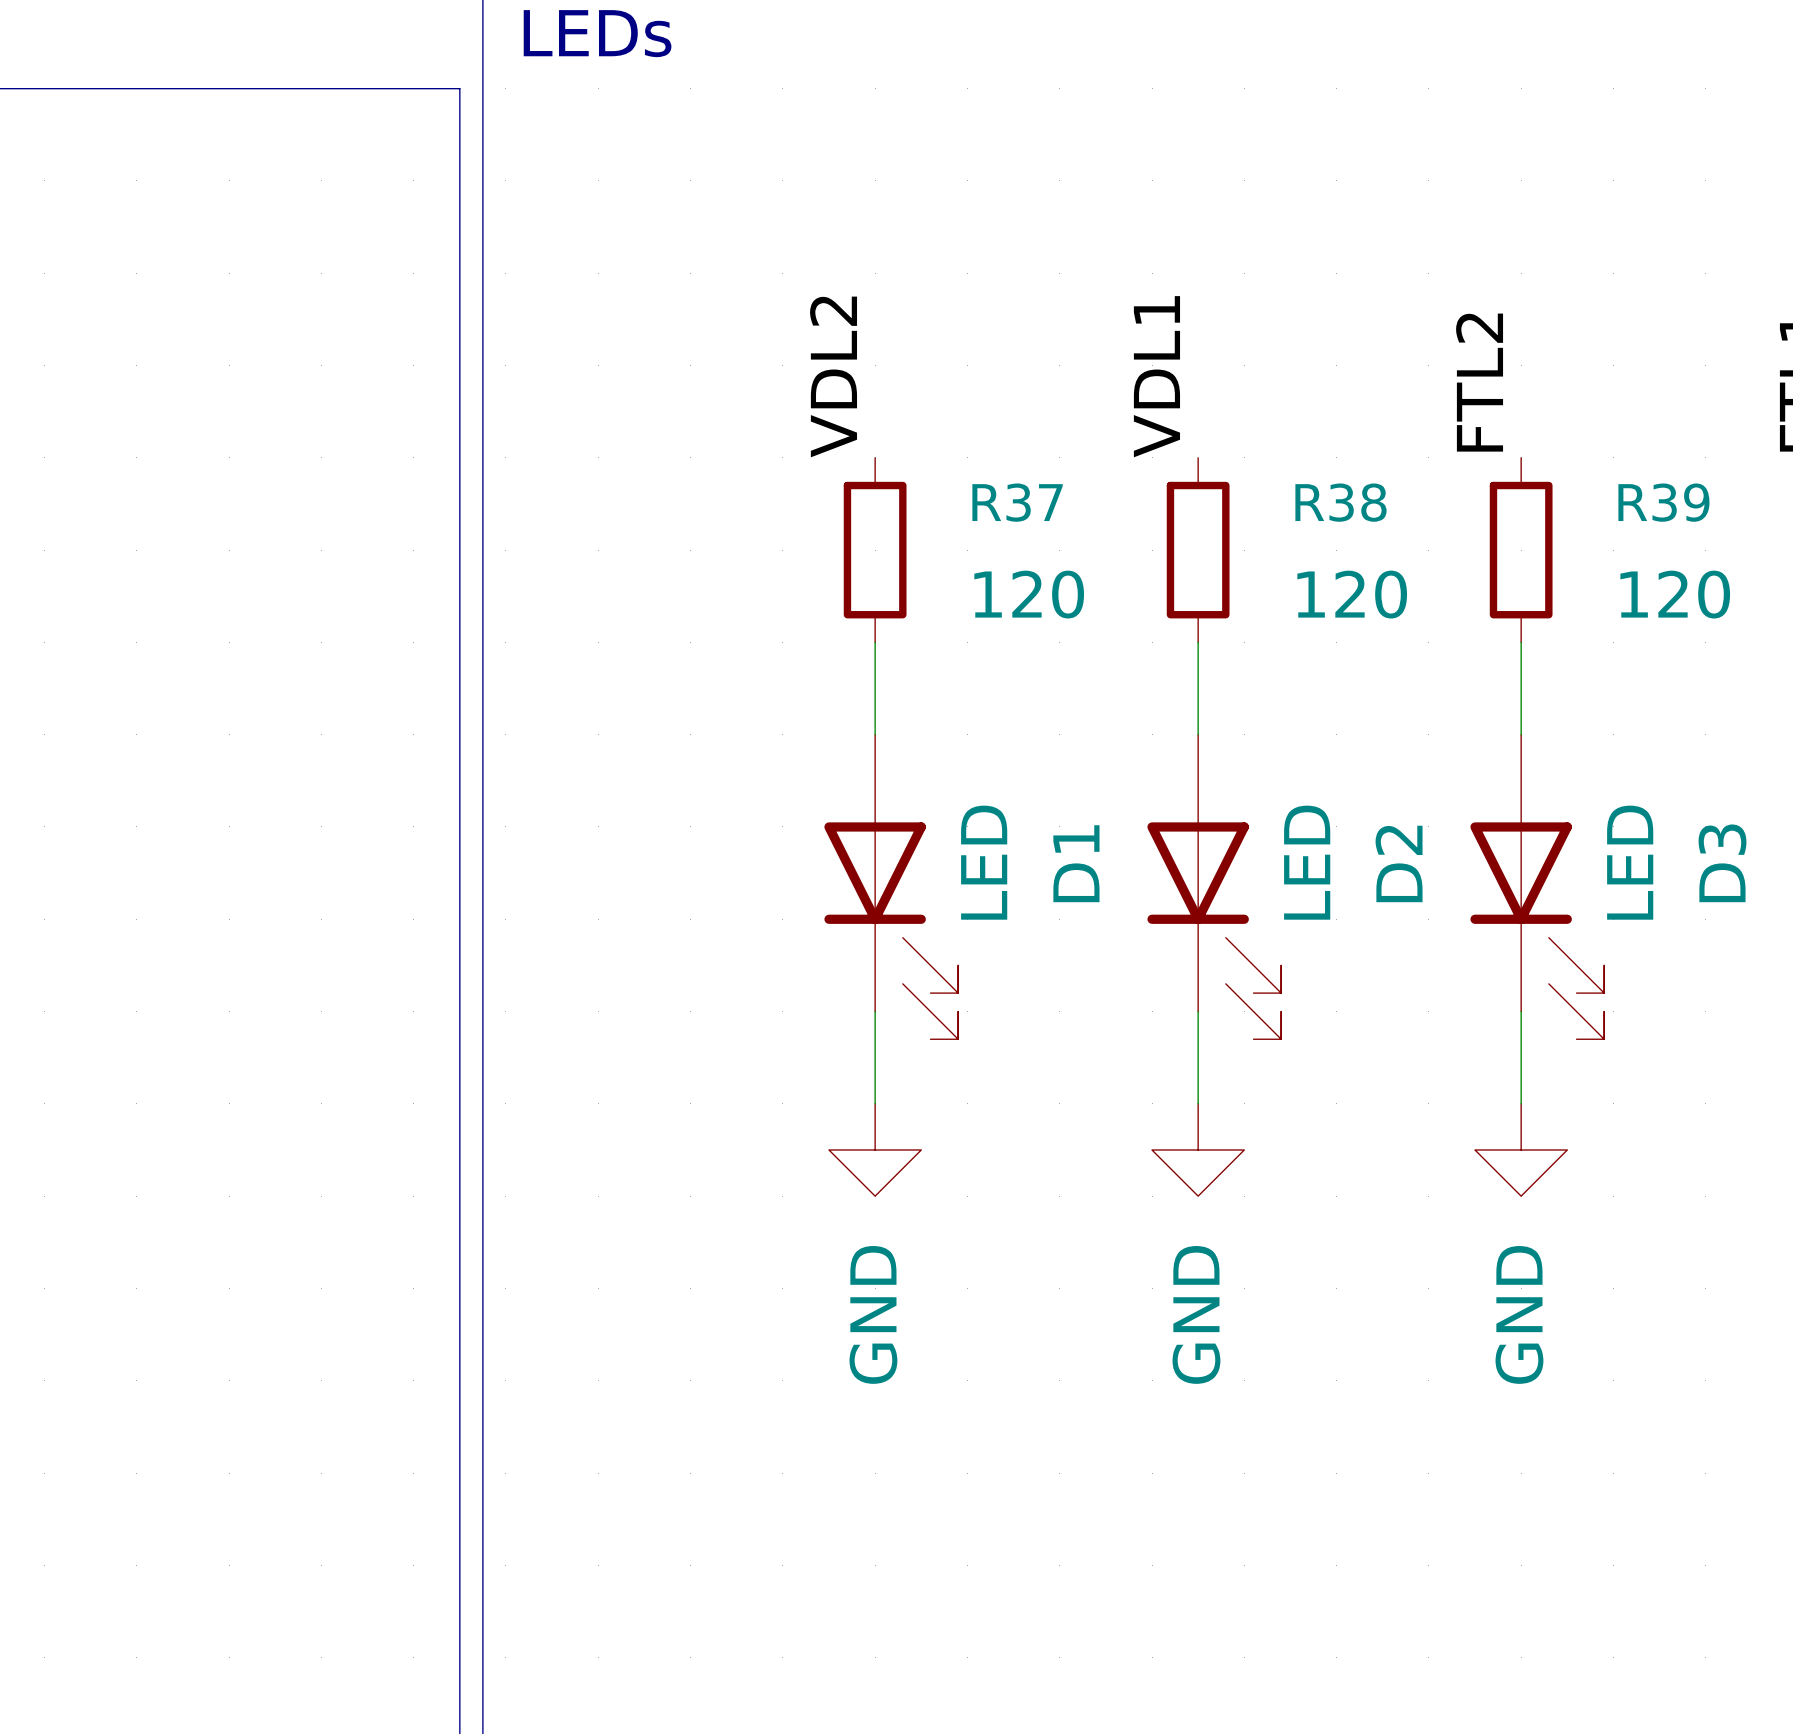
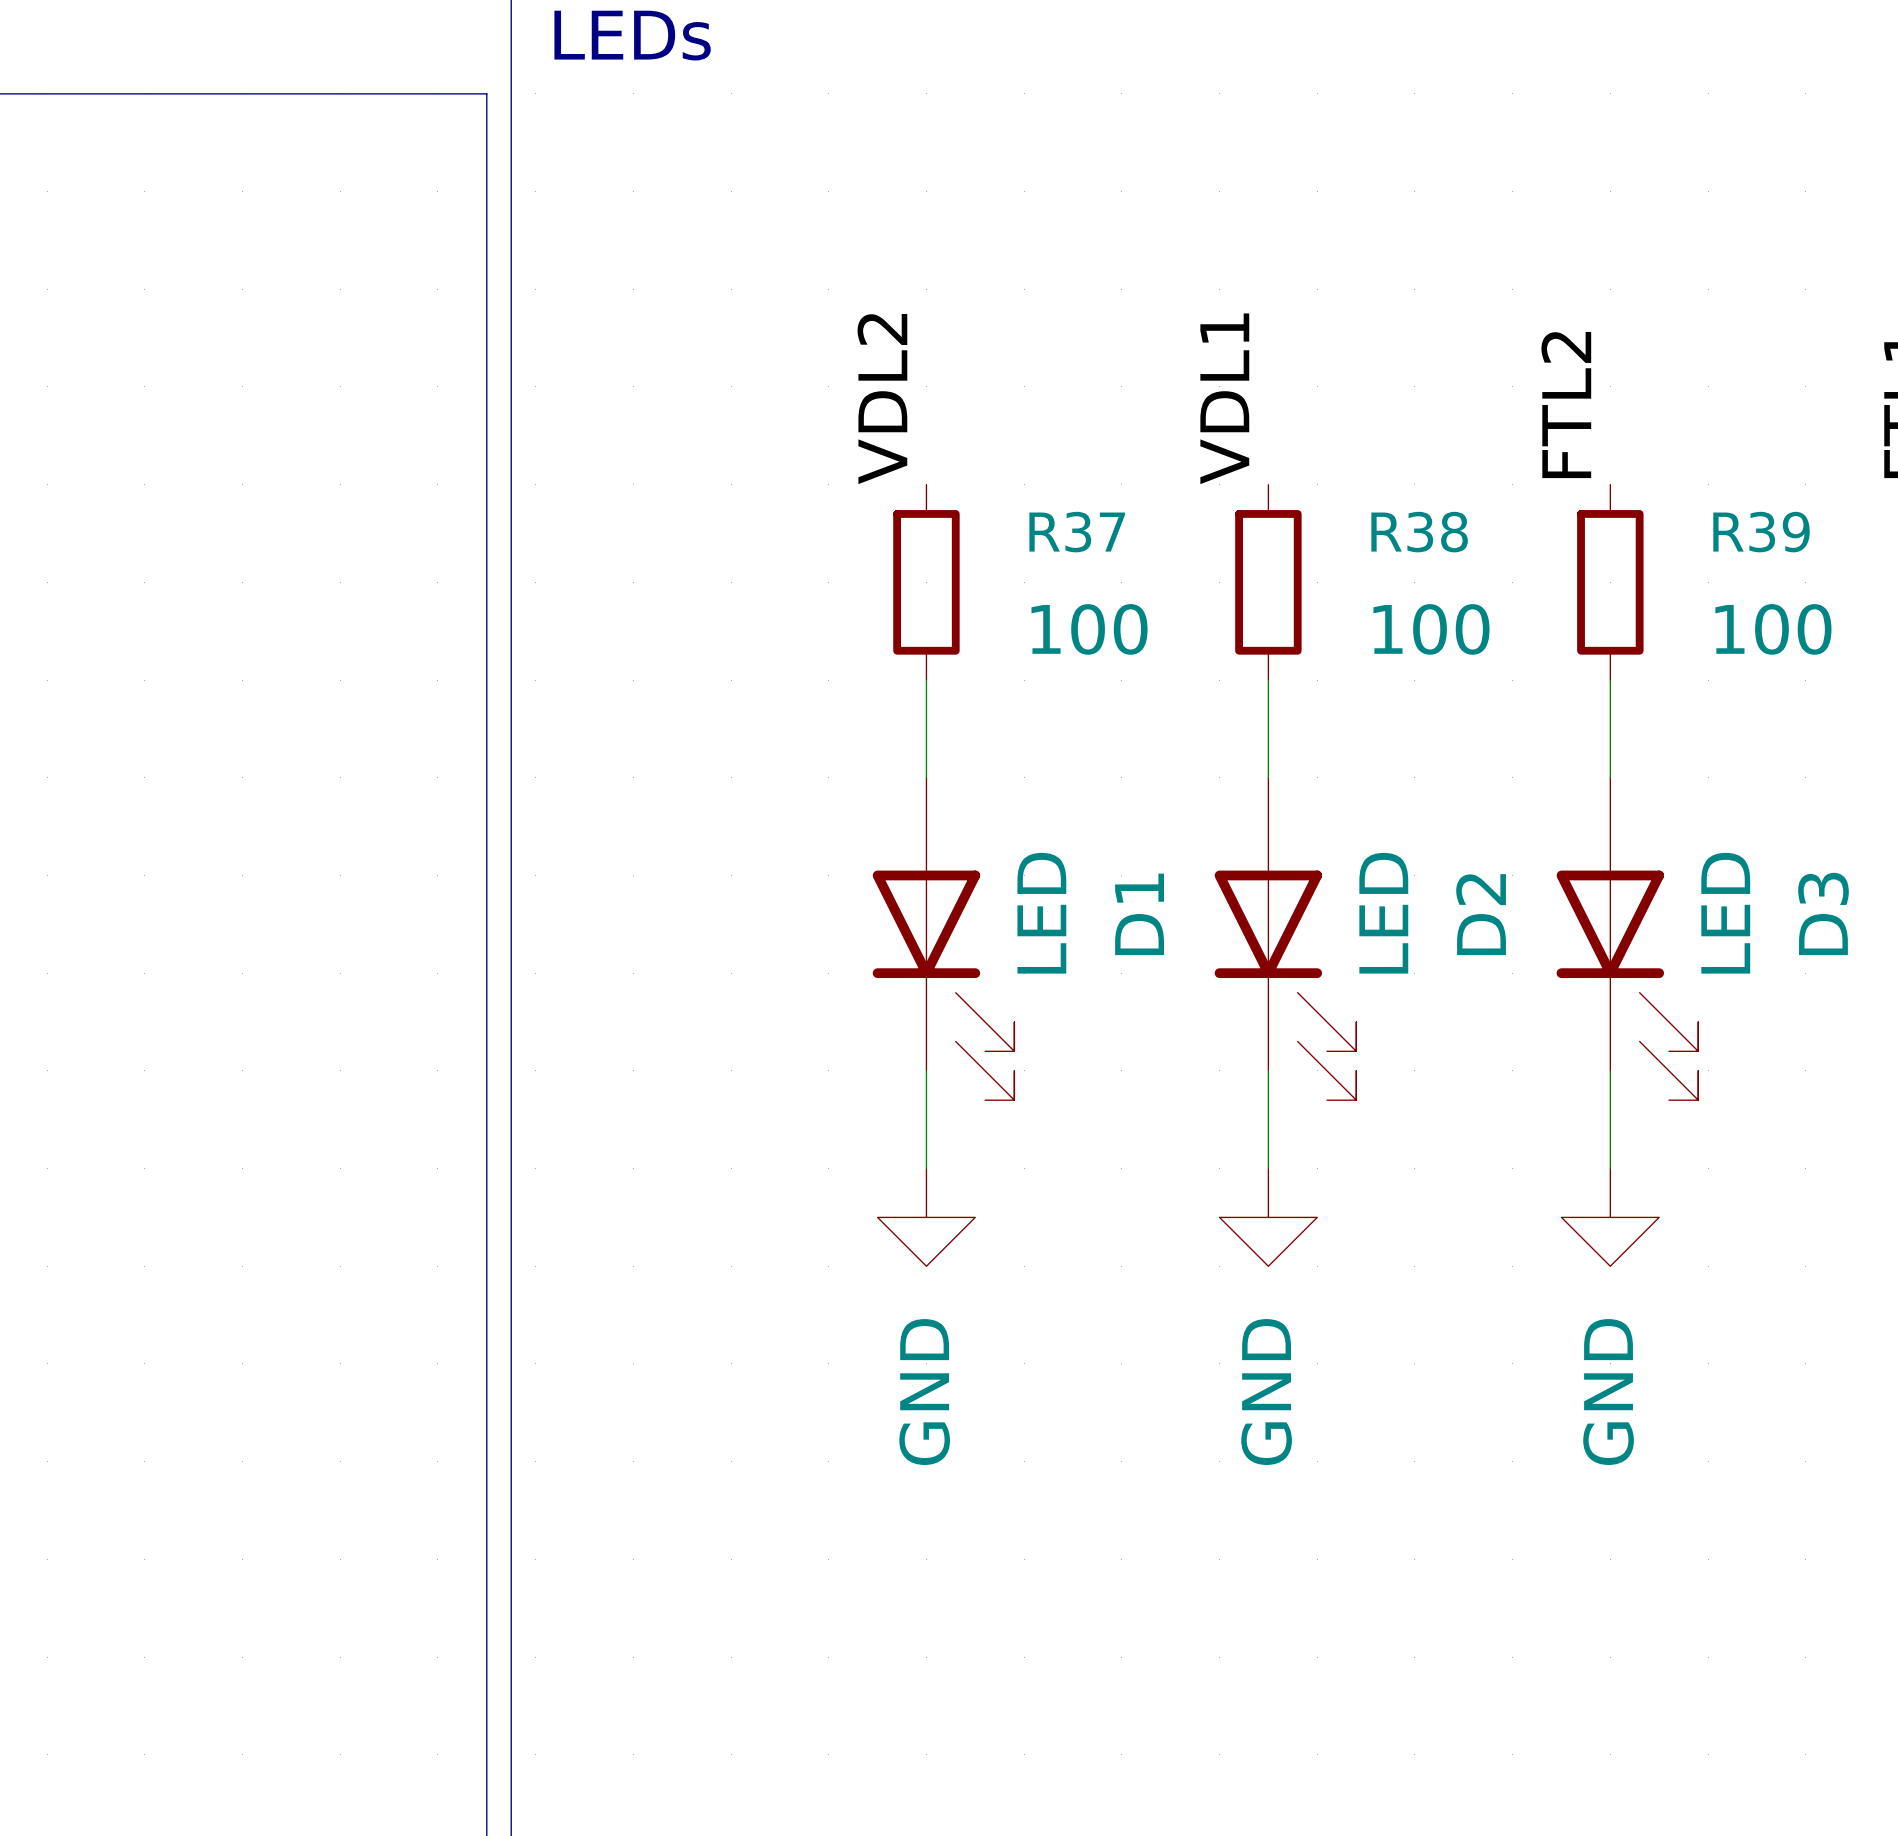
R37 value: 120 (1029, 594) -> 100 (1089, 629)
R38 value: 120 (1352, 594) -> 100 (1431, 629)
R39 value: 120 (1675, 594) -> 100 (1773, 629)

